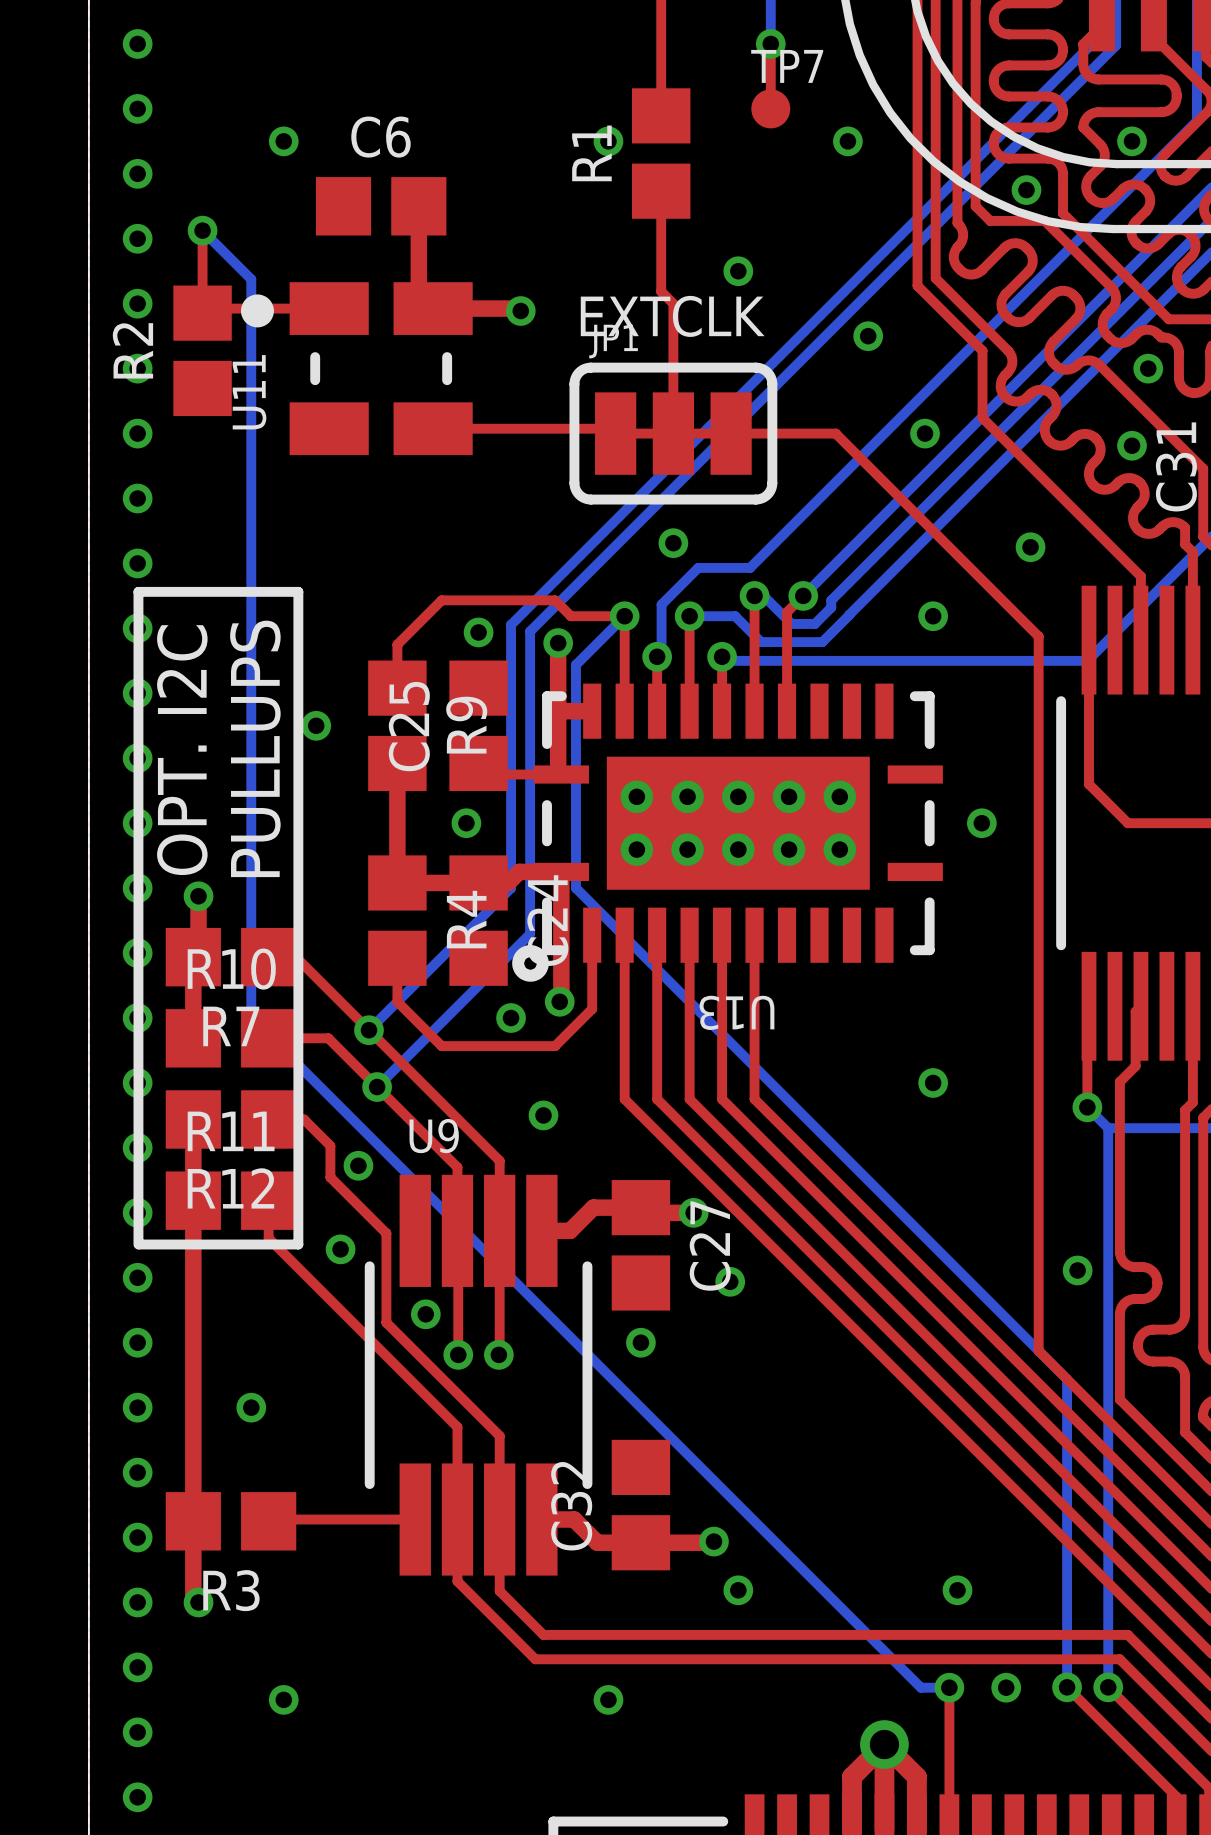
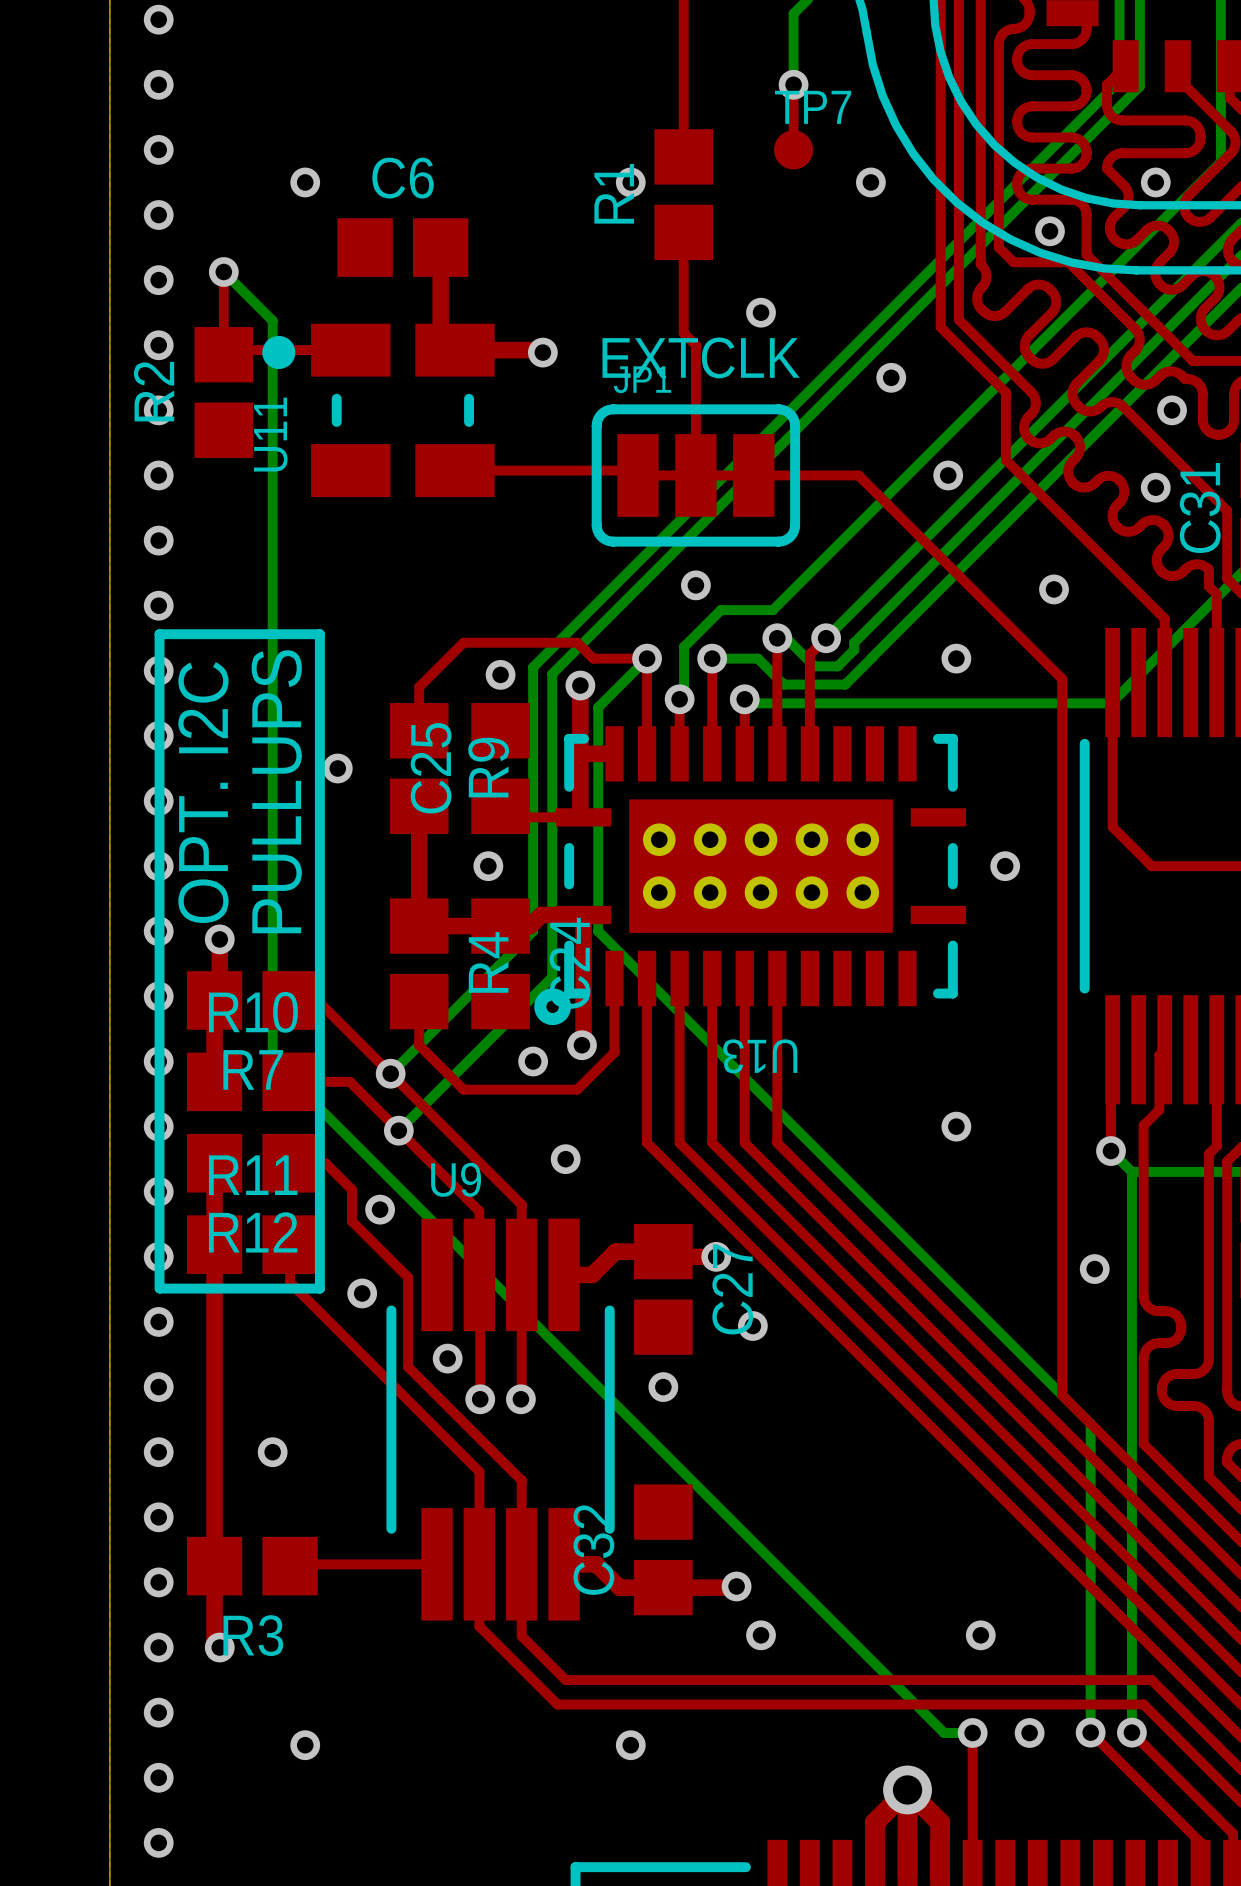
via position: (1077, 1270) -> (1094, 1269)

